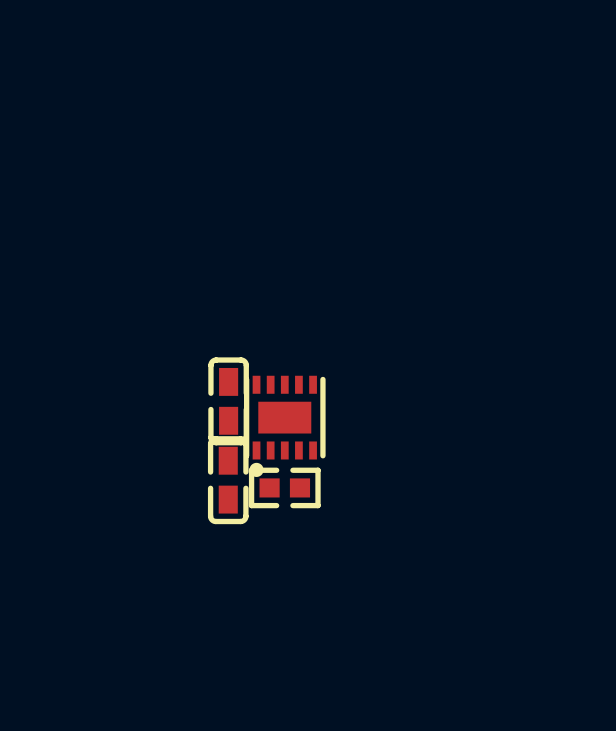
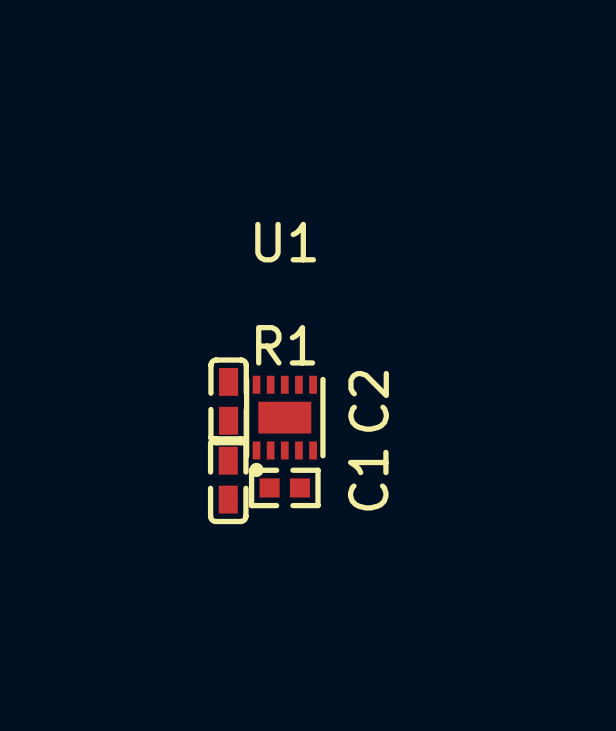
U1 name: none -> U1 (285, 242)
R1 name: none -> R1 (285, 345)
C2 name: none -> C2 (368, 401)
C1 name: none -> C1 (368, 480)

